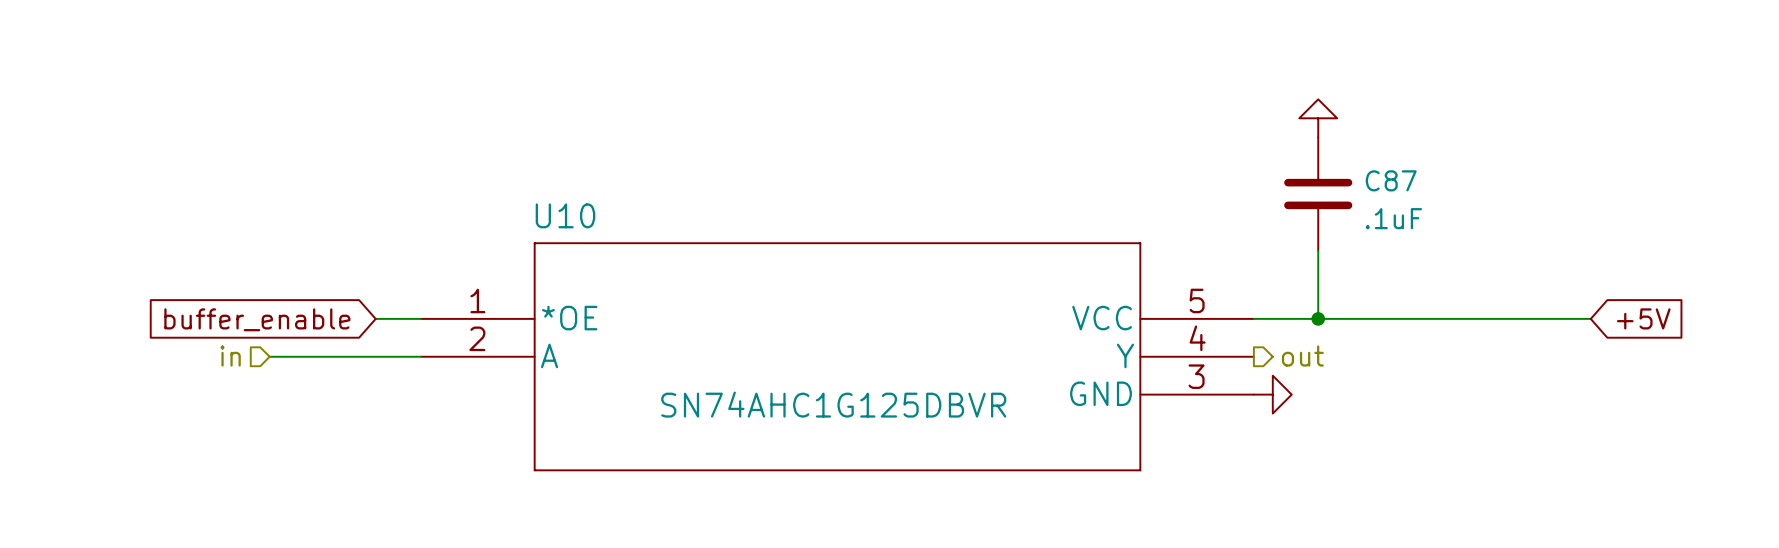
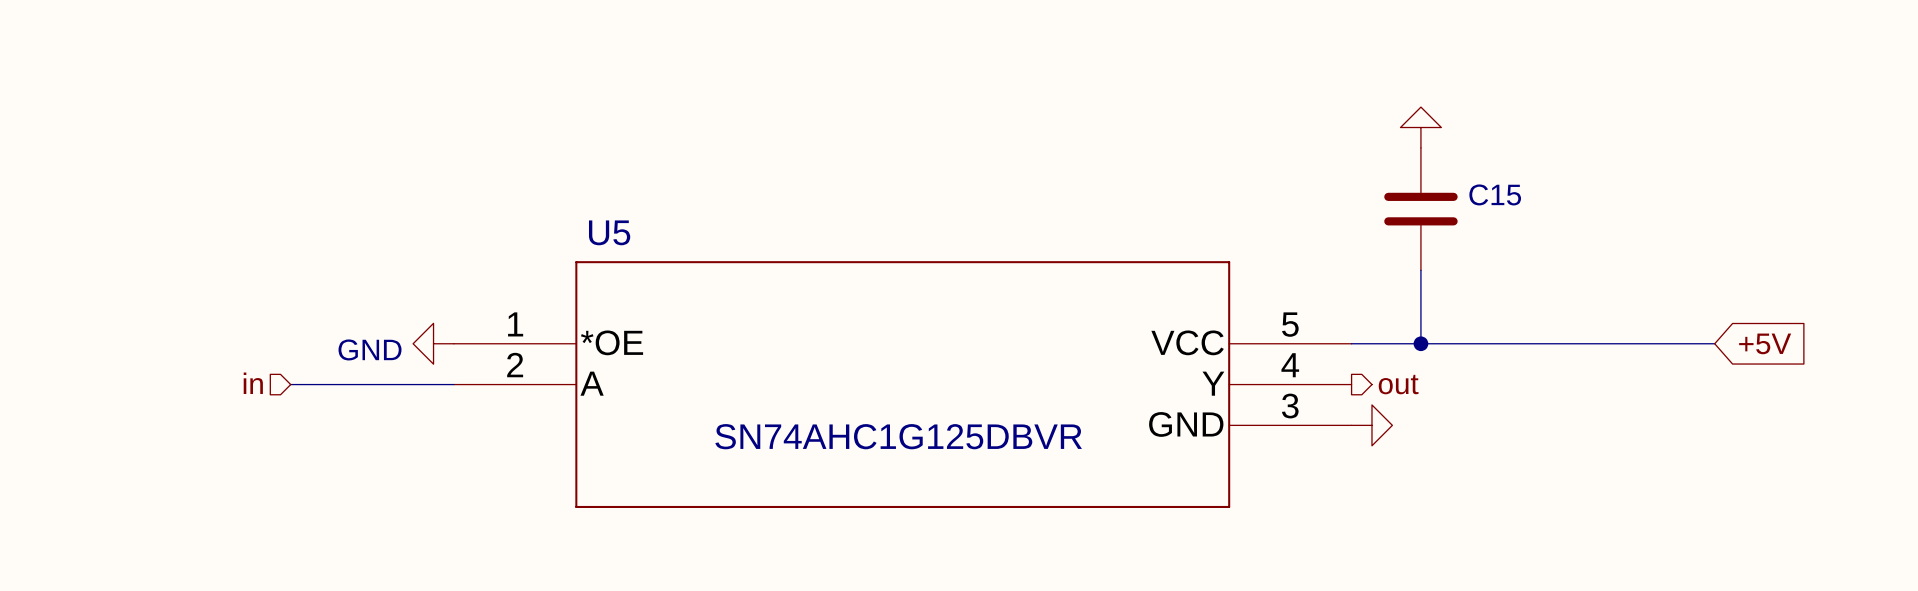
C87 name: C87 (1391, 180) -> C15 (1495, 194)
U10 name: U10 (565, 215) -> U5 (609, 232)
C87 value: .1uF (1393, 218) -> none
wire: (375, 318) (421, 318) -> none
power symbol: none -> GND (433, 343)
global label: buffer_enable (257, 319) -> none

